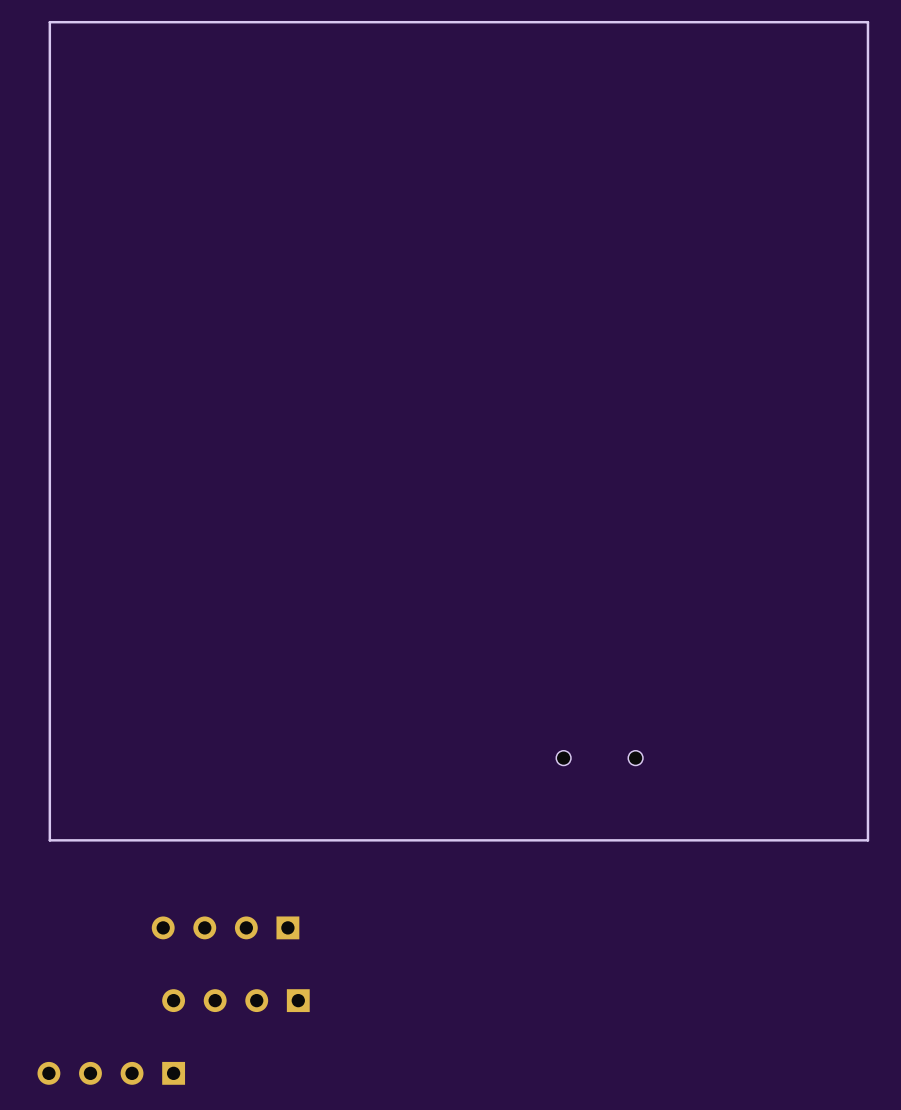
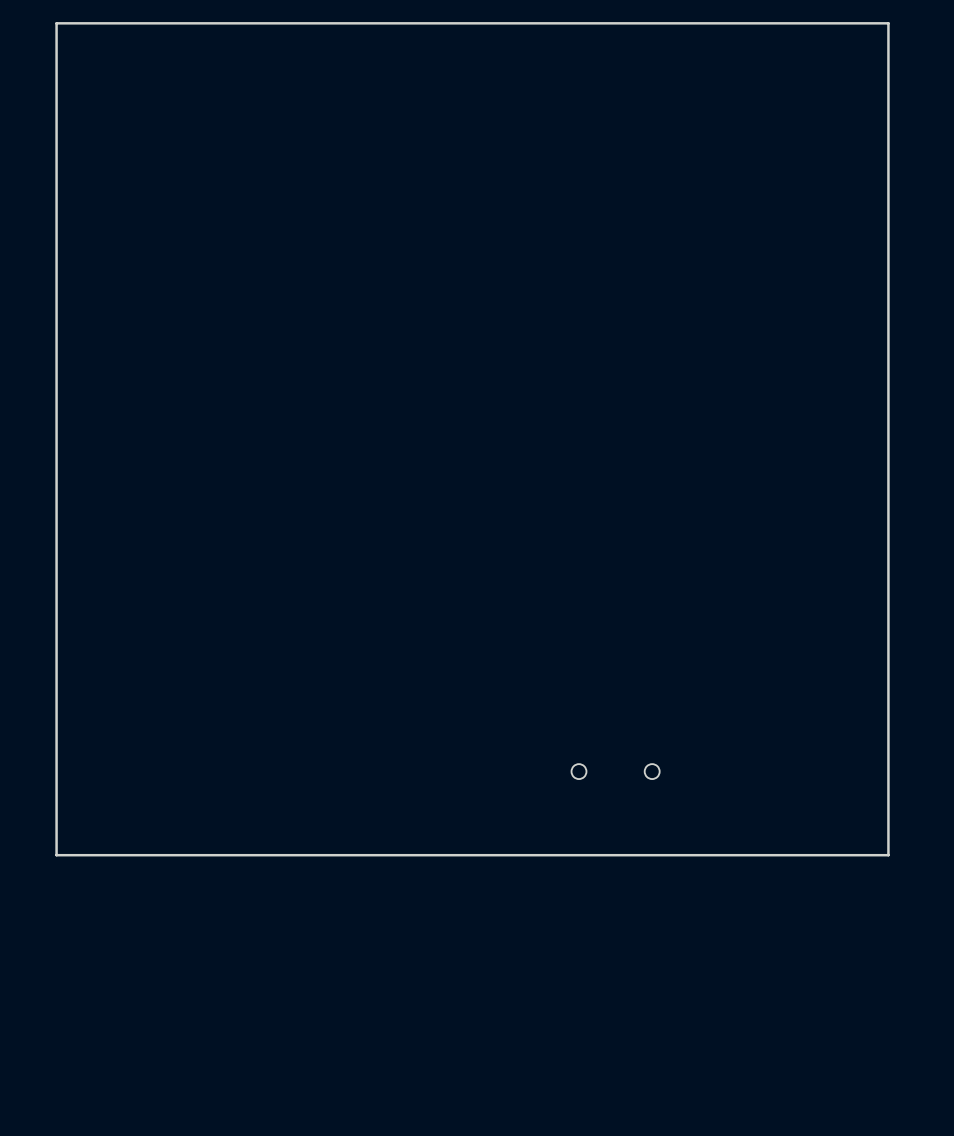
part: (225, 927) -> none
part: (235, 1000) -> none
part: (111, 1073) -> none

